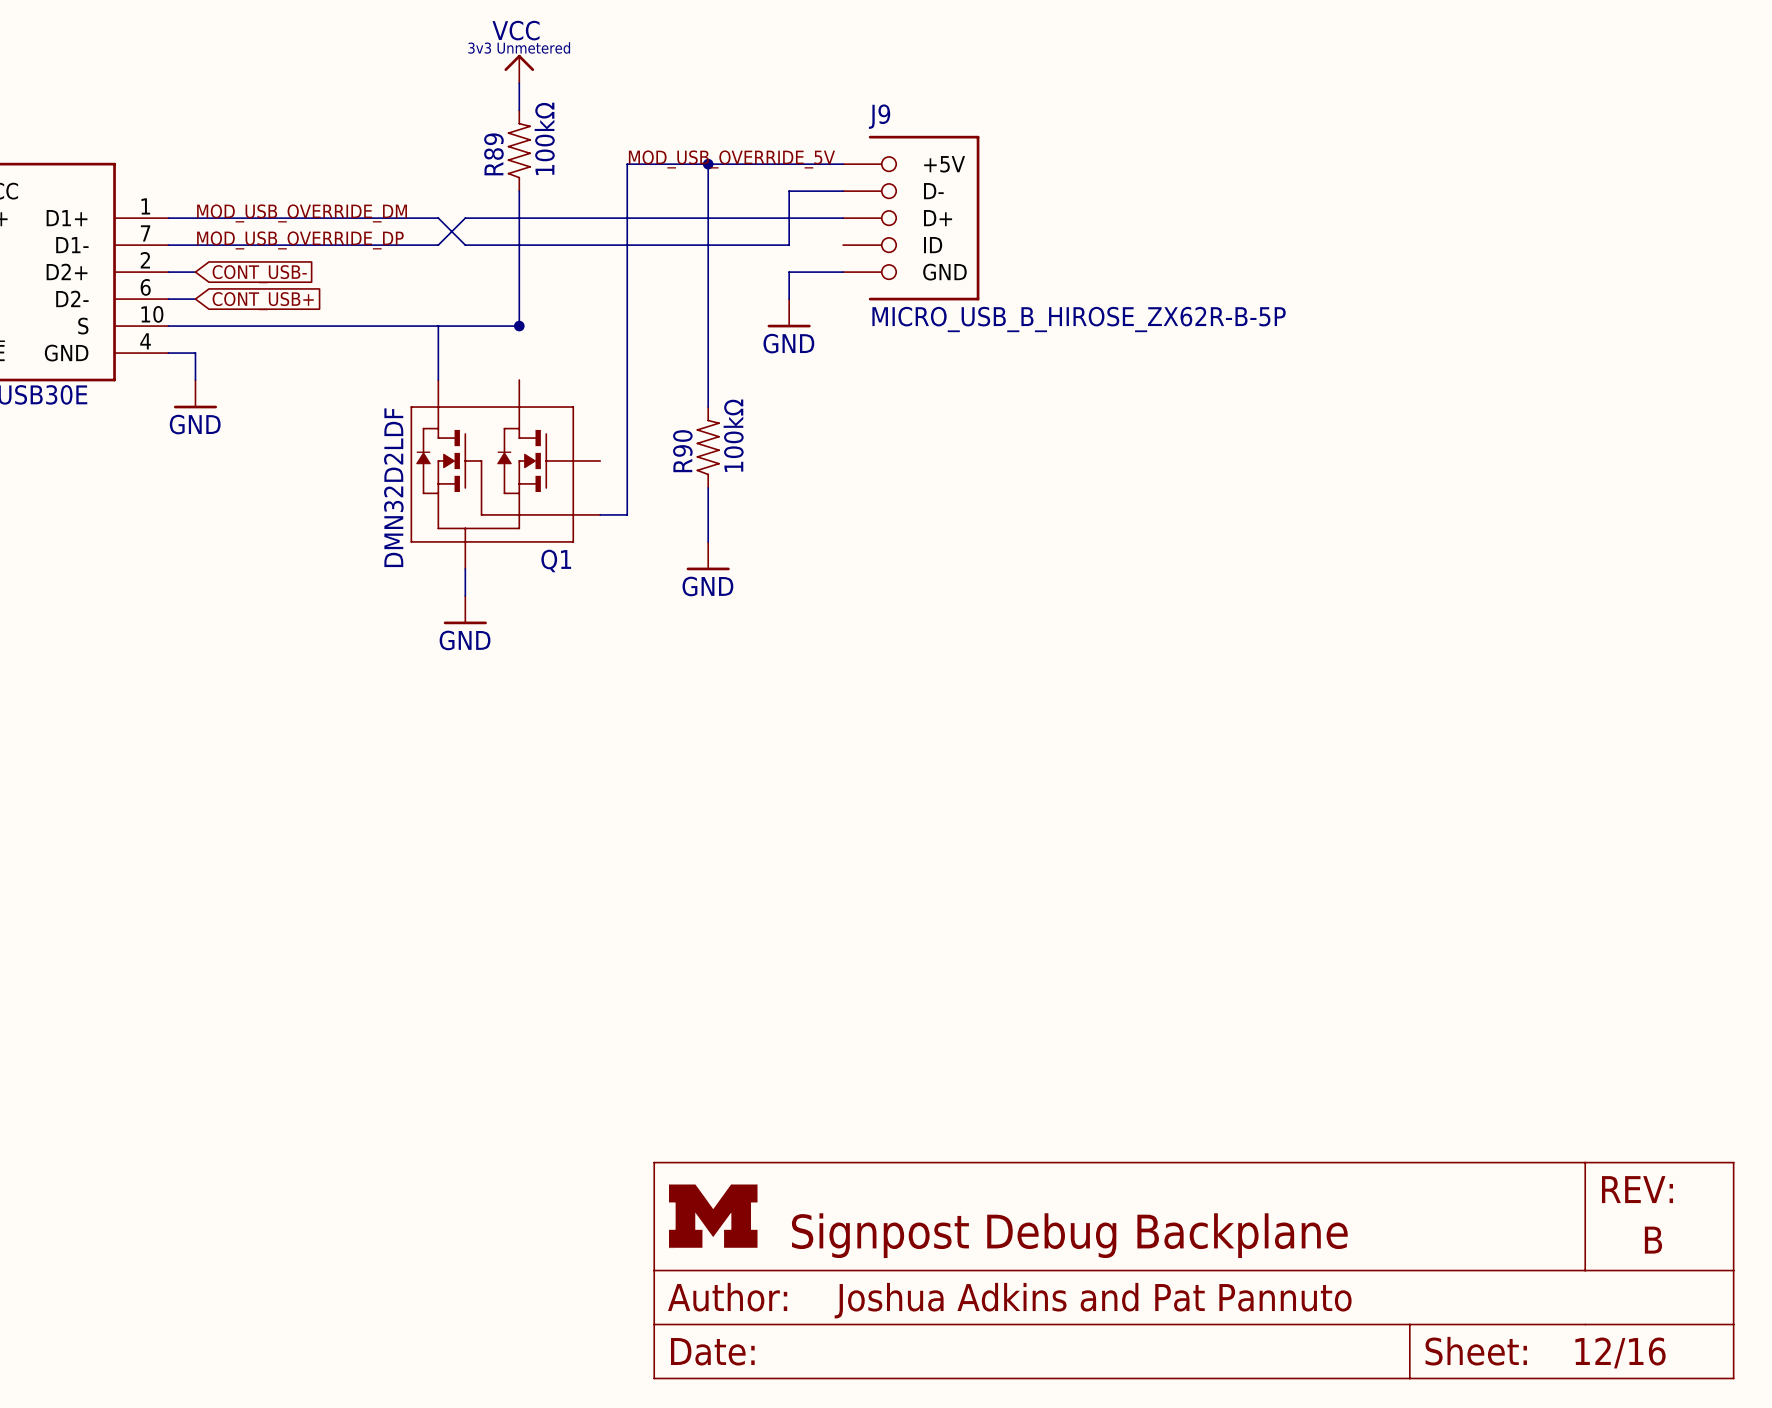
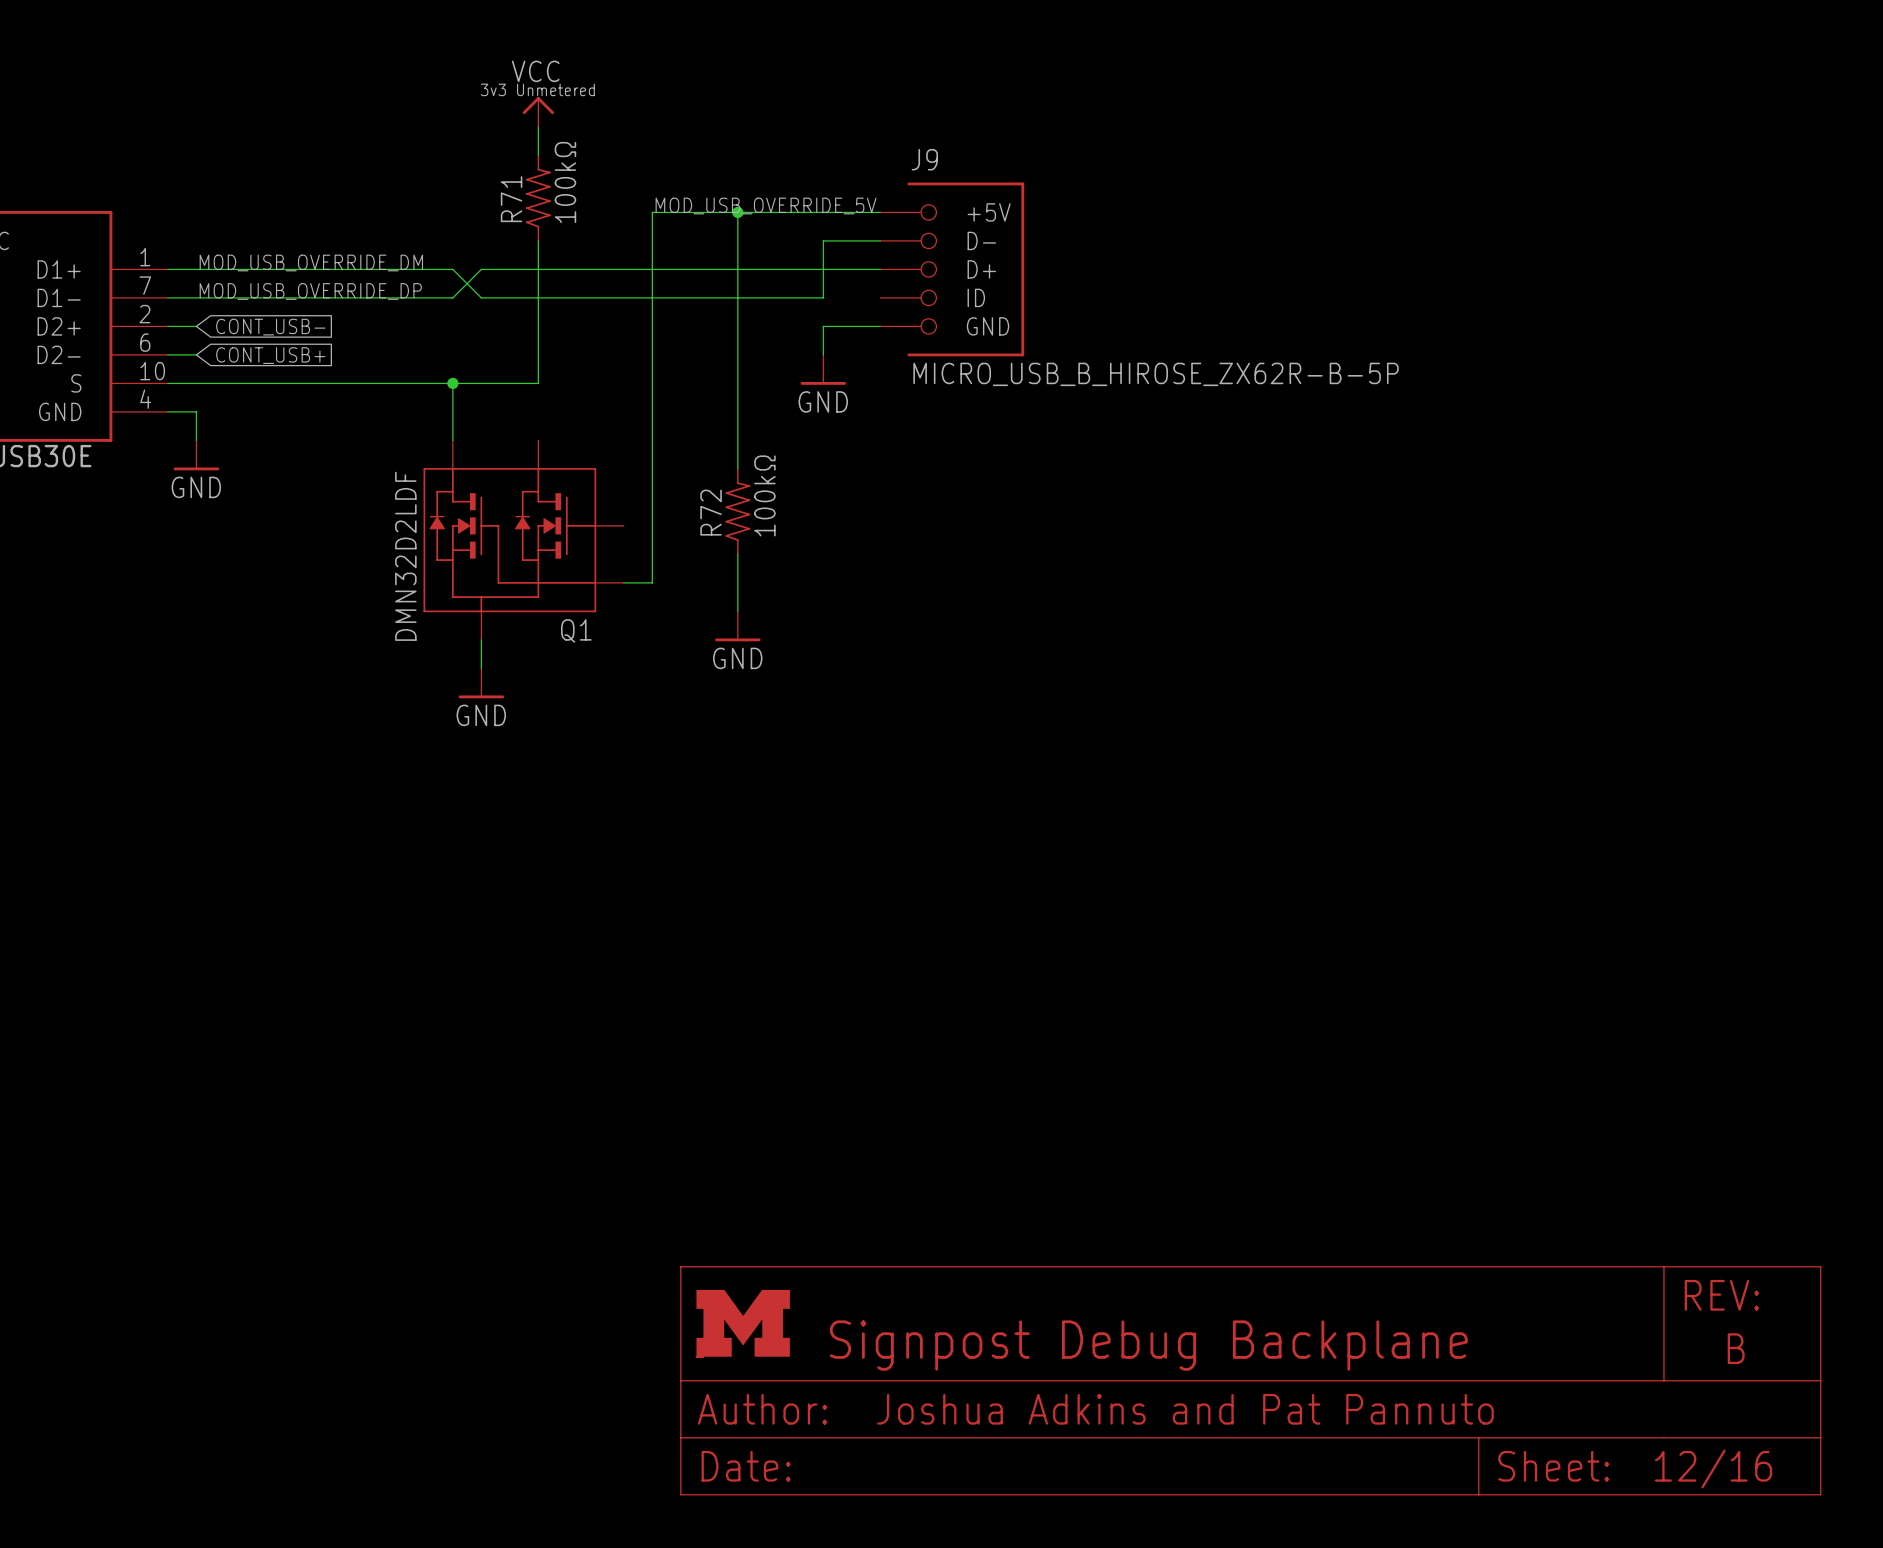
R89 name: R89 (493, 154) -> R71 (511, 199)
junction: none -> (452, 383)
junction: (519, 326) -> none
R90 name: R90 (682, 451) -> R72 (711, 512)

